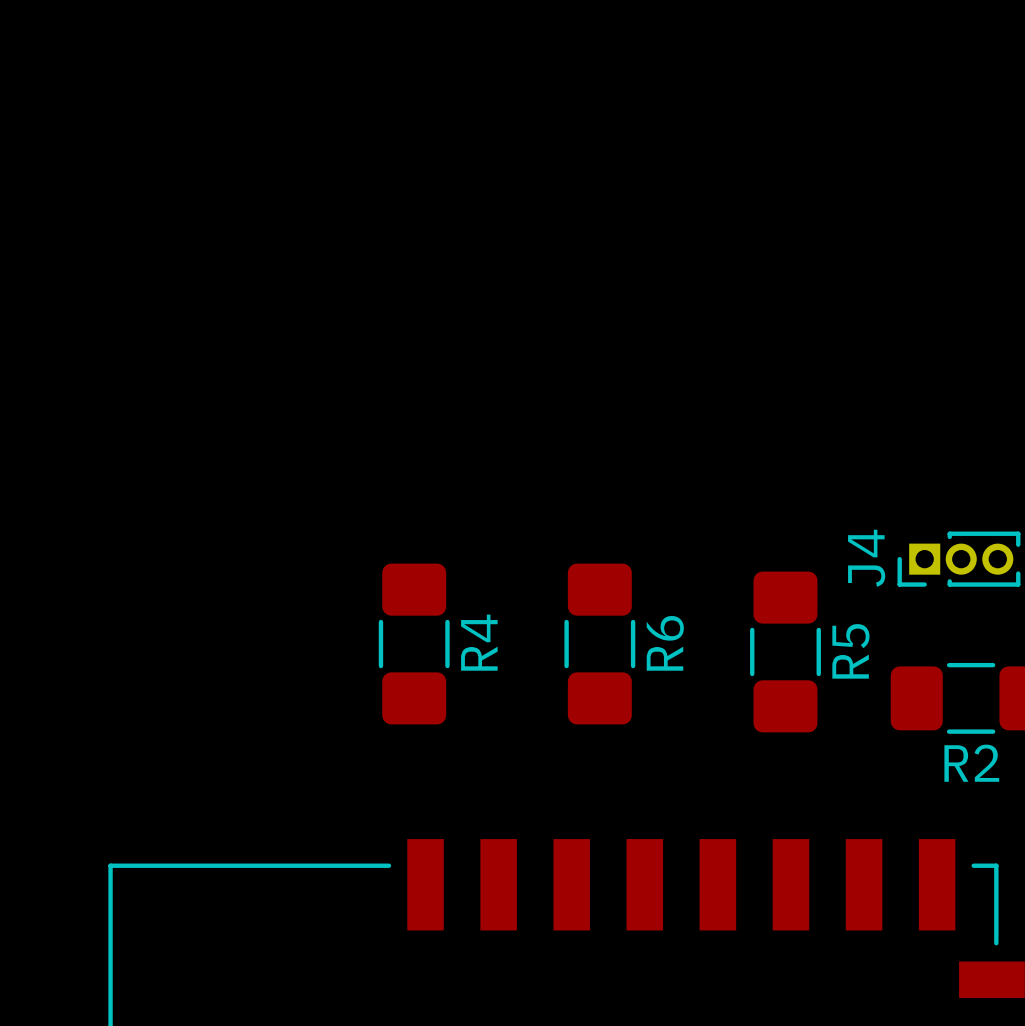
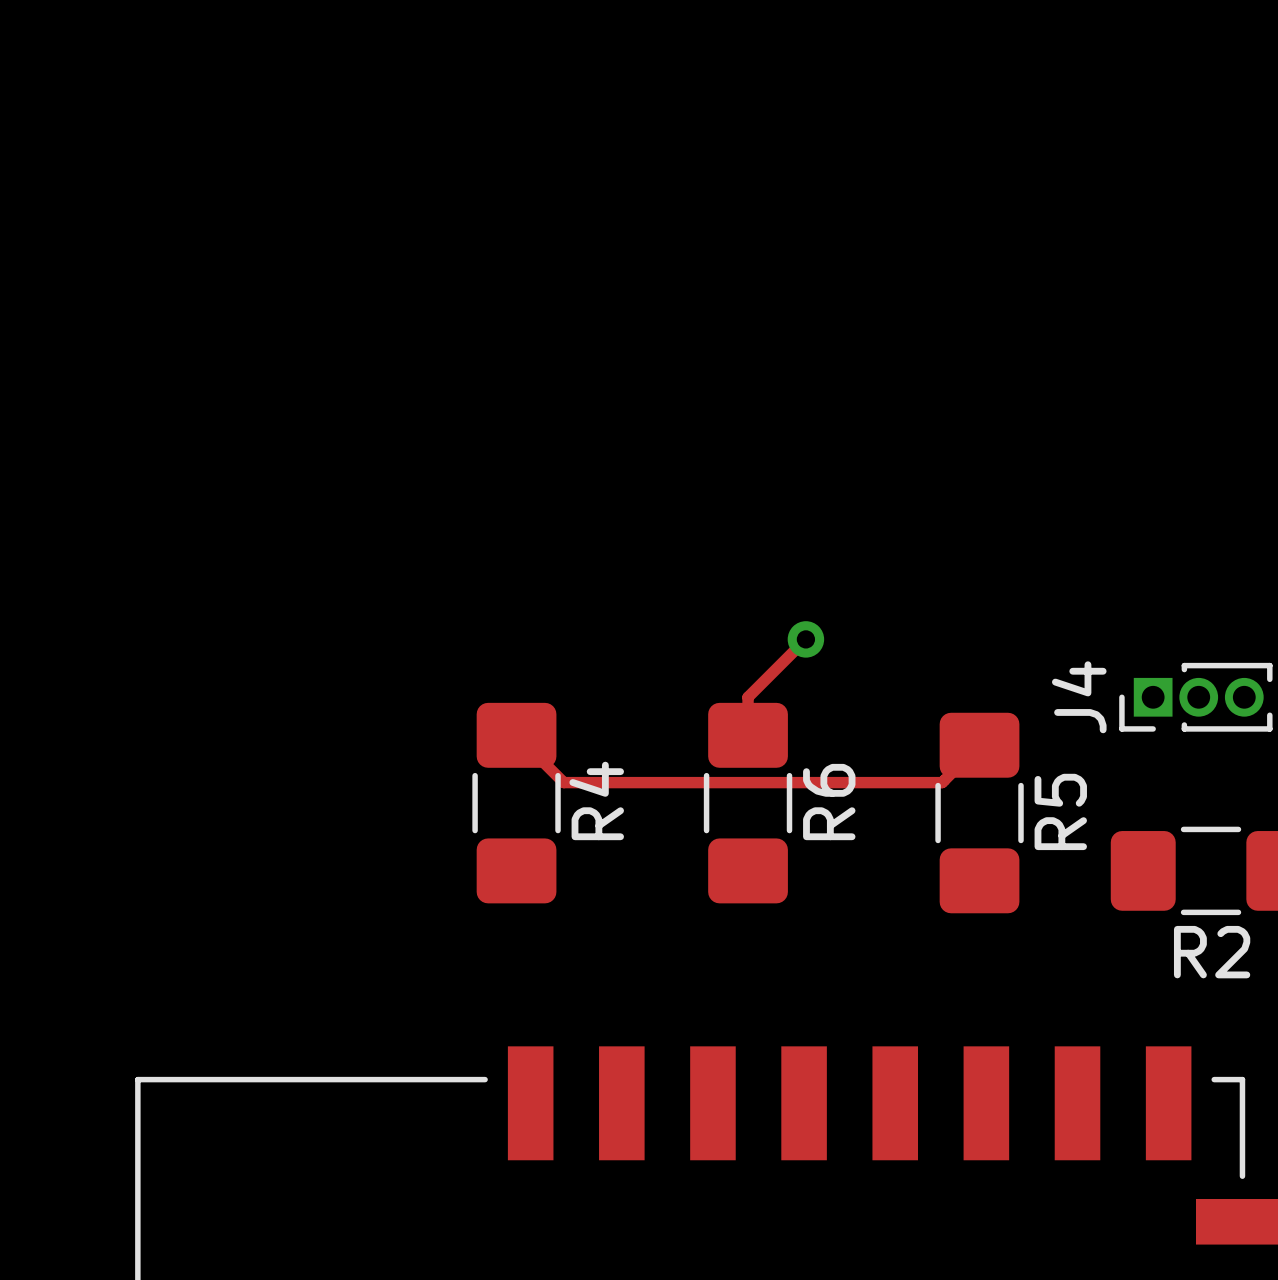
track: none -> (805, 639) (748, 697) (748, 735)
via: none -> (805, 639)
track: none -> (516, 735) (563, 782) (942, 782) (979, 745)

